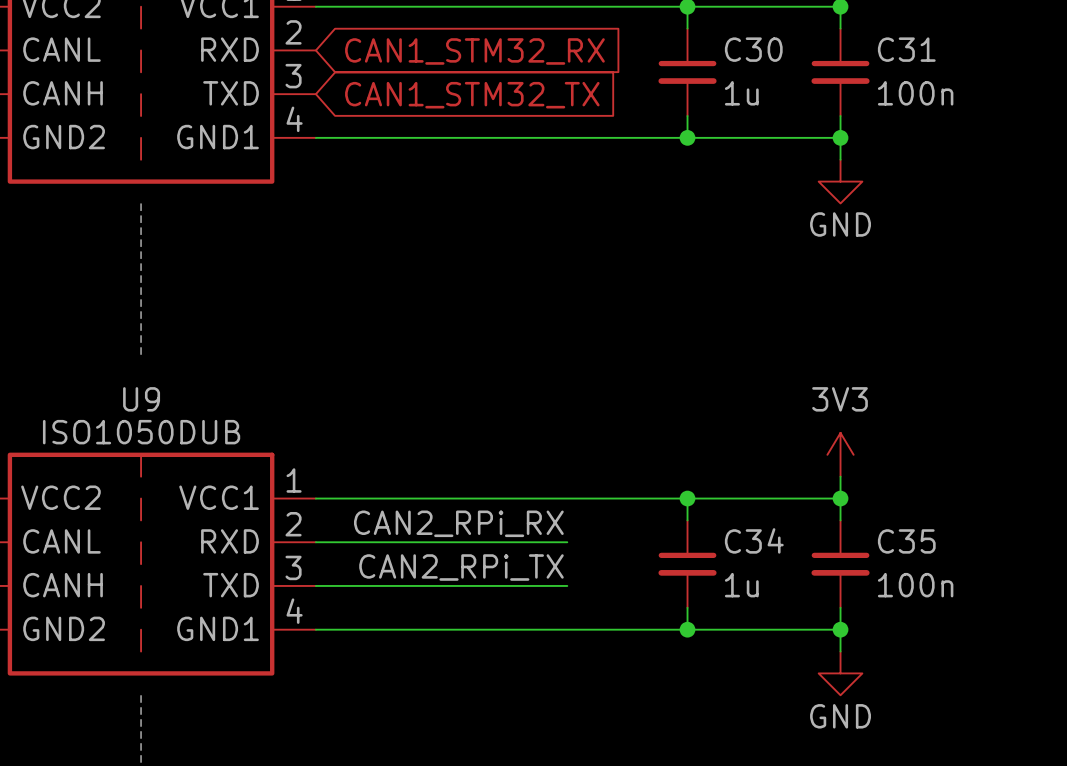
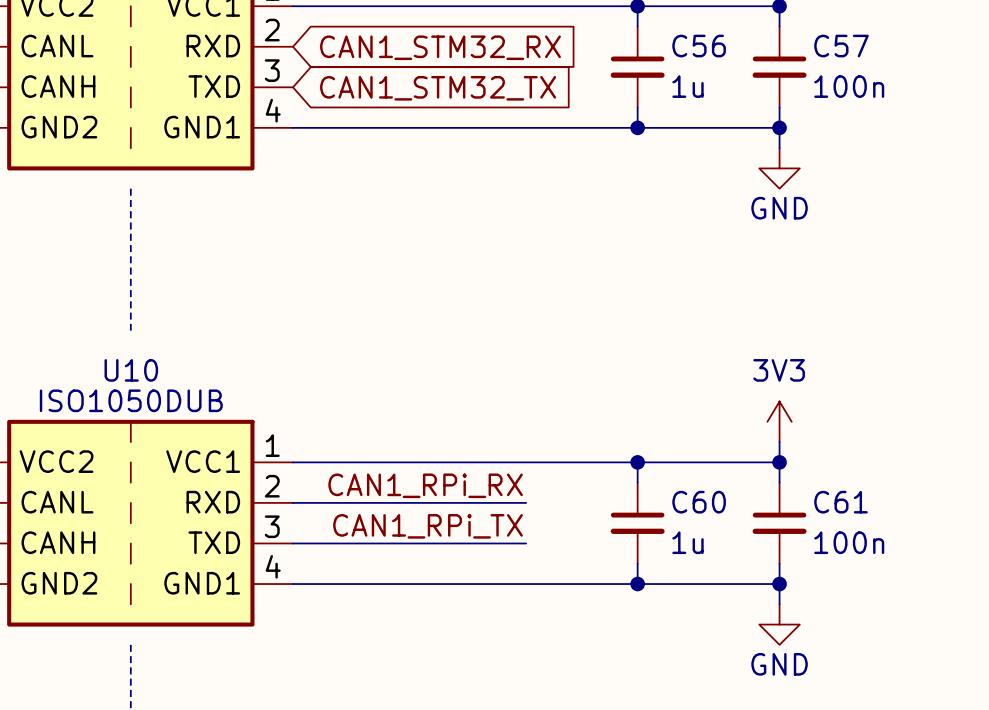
C30 name: C30 (753, 49) -> C56 (699, 46)
C31 name: C31 (906, 49) -> C57 (841, 46)
U9 name: U9 (141, 399) -> U10 (131, 370)
label: CAN2_RPi_RX (458, 523) -> CAN1_RPi_RX (425, 485)
C34 name: C34 (754, 540) -> C60 (699, 502)
C35 name: C35 (906, 541) -> C61 (841, 502)
label: CAN2_RPi_TX (461, 567) -> CAN1_RPi_TX (428, 526)

